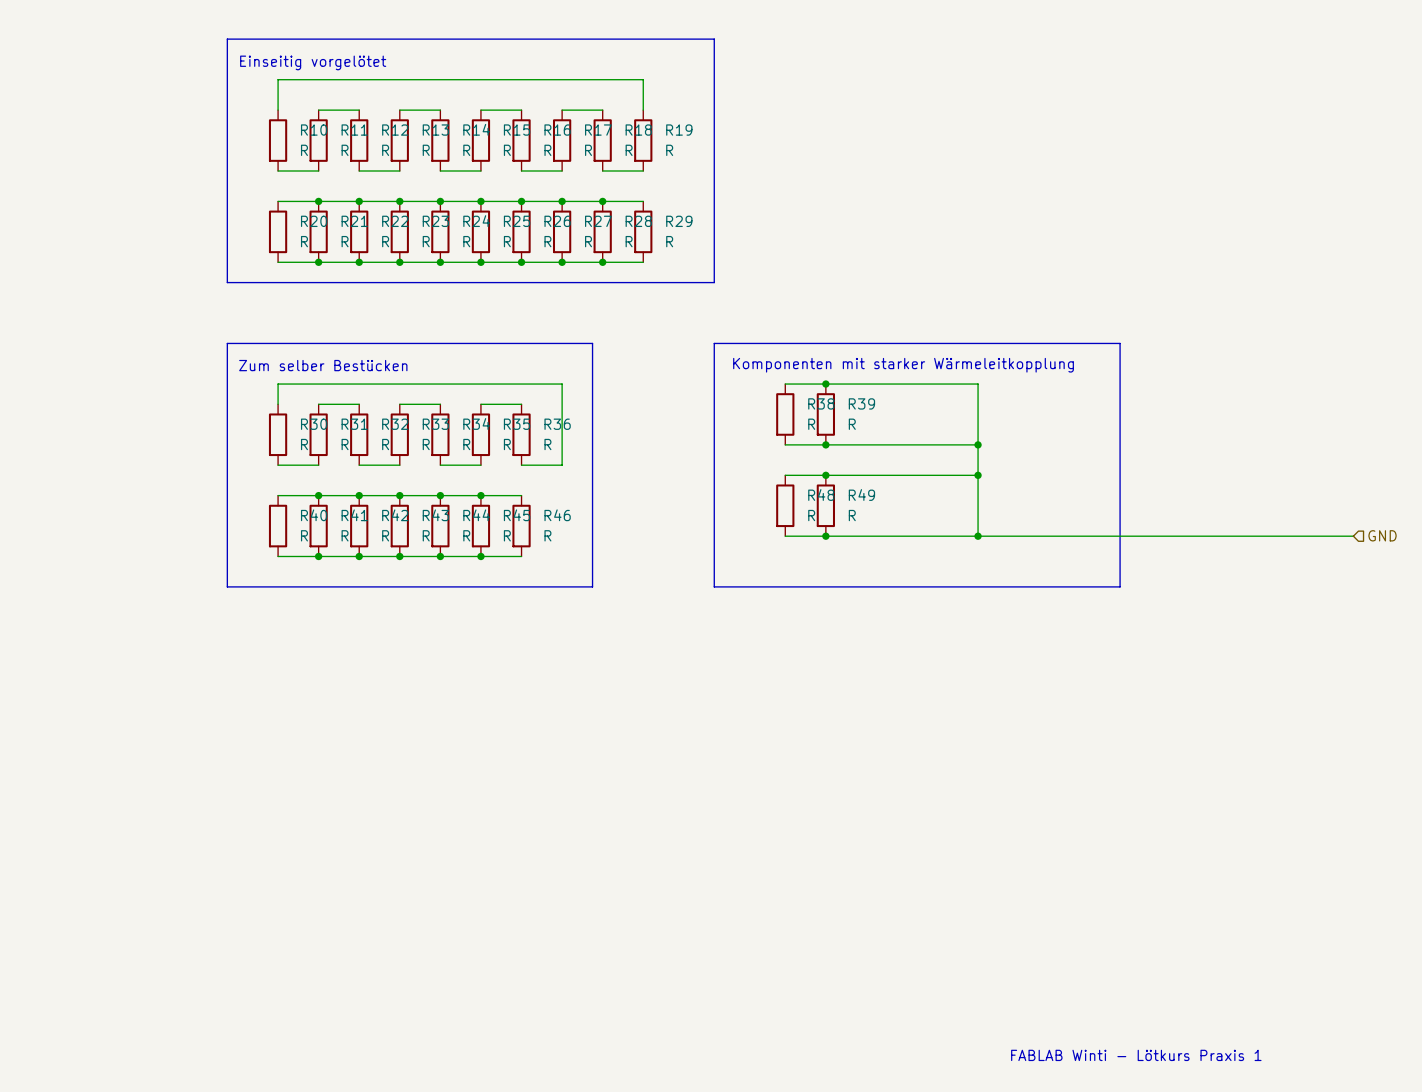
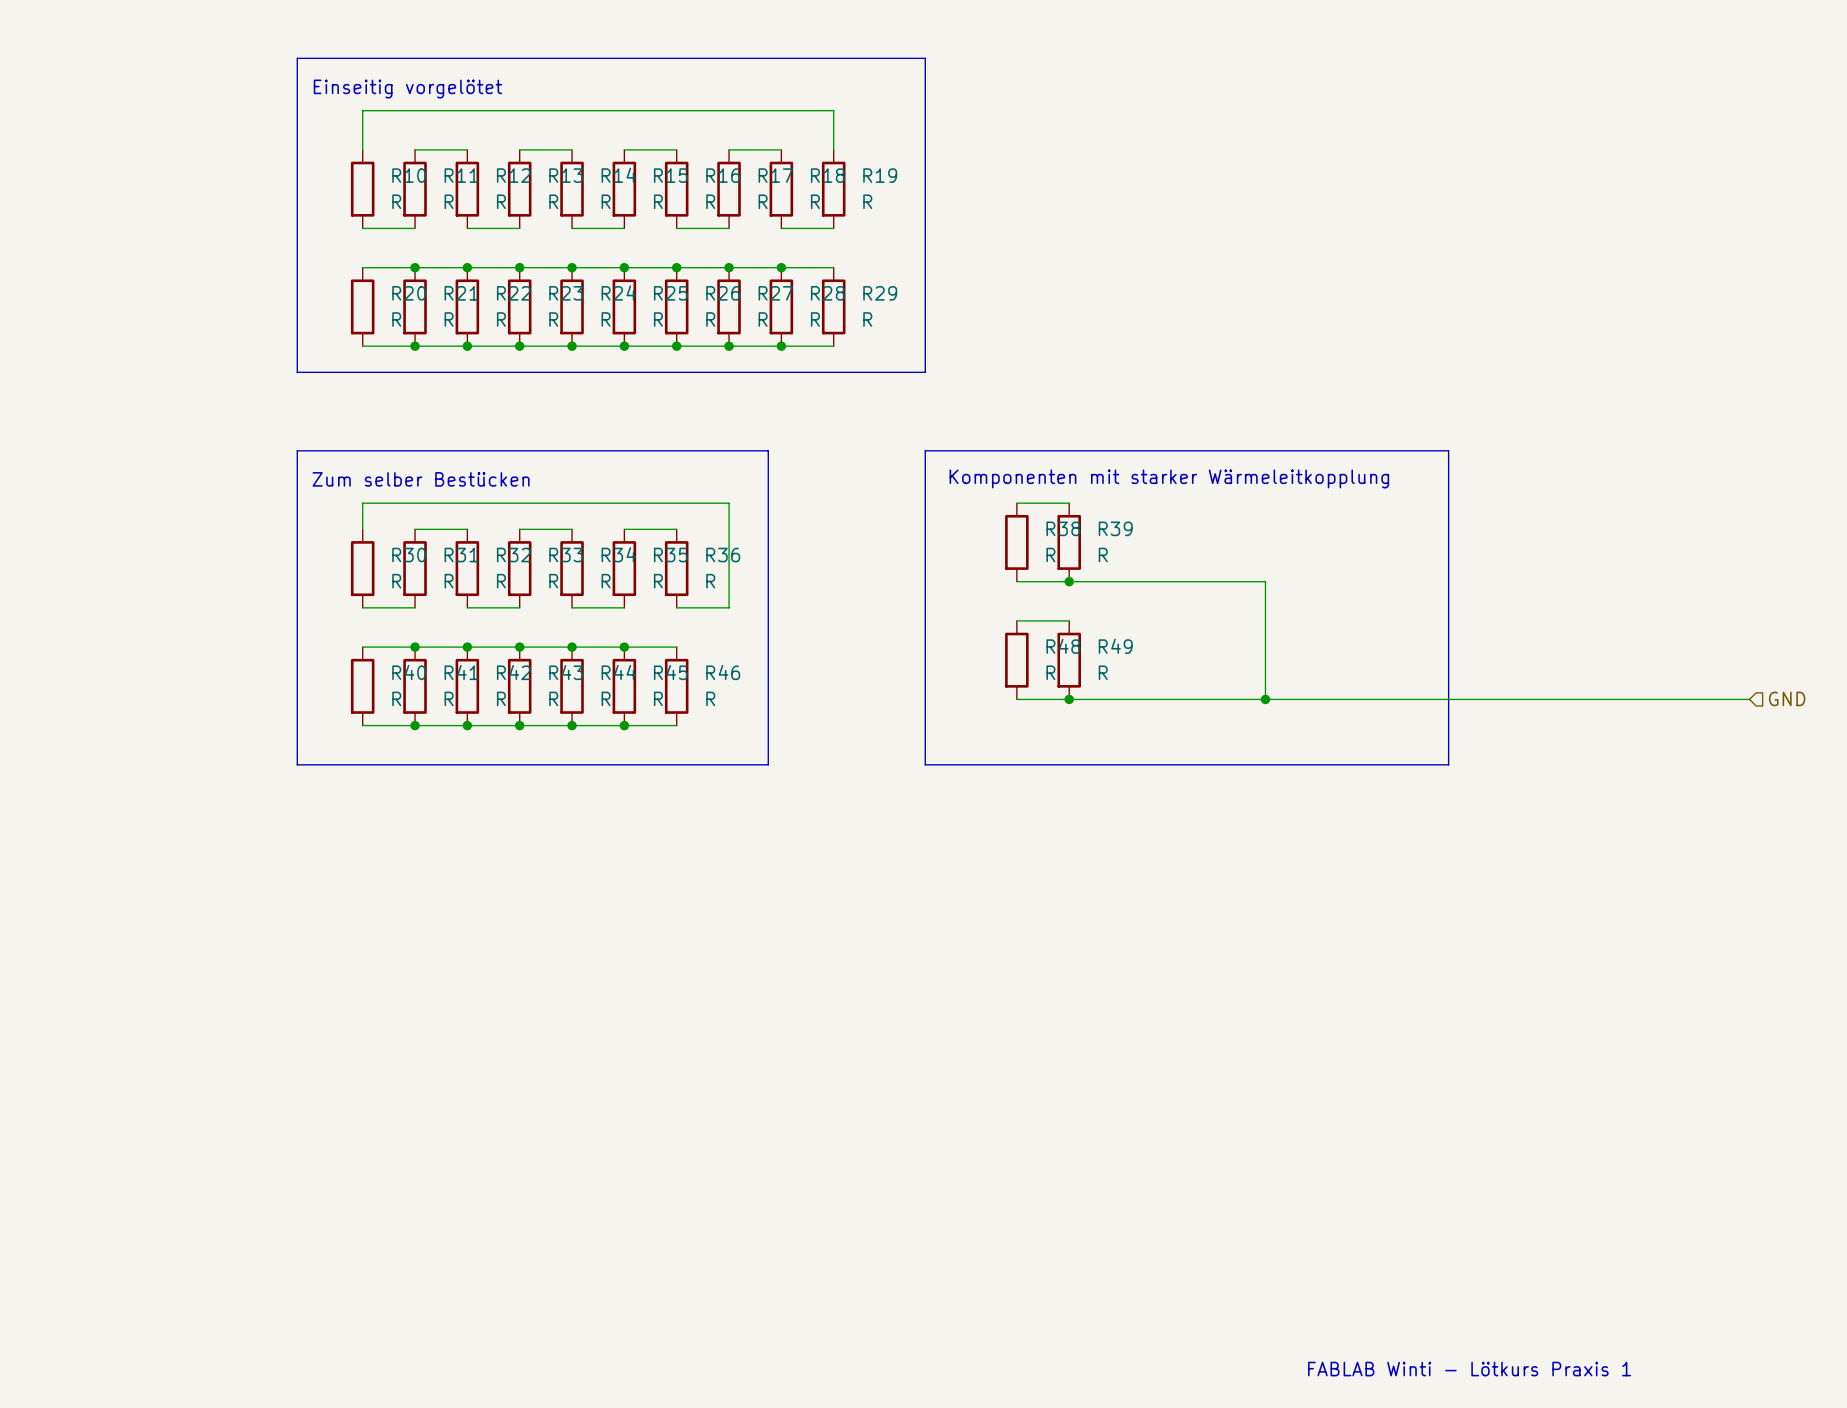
wire: (825, 384) (978, 384) (978, 444) -> none
junction: (825, 384) -> none
junction: (978, 444) -> none
wire: (825, 475) (978, 475) -> none
junction: (825, 475) -> none
junction: (978, 475) -> none

